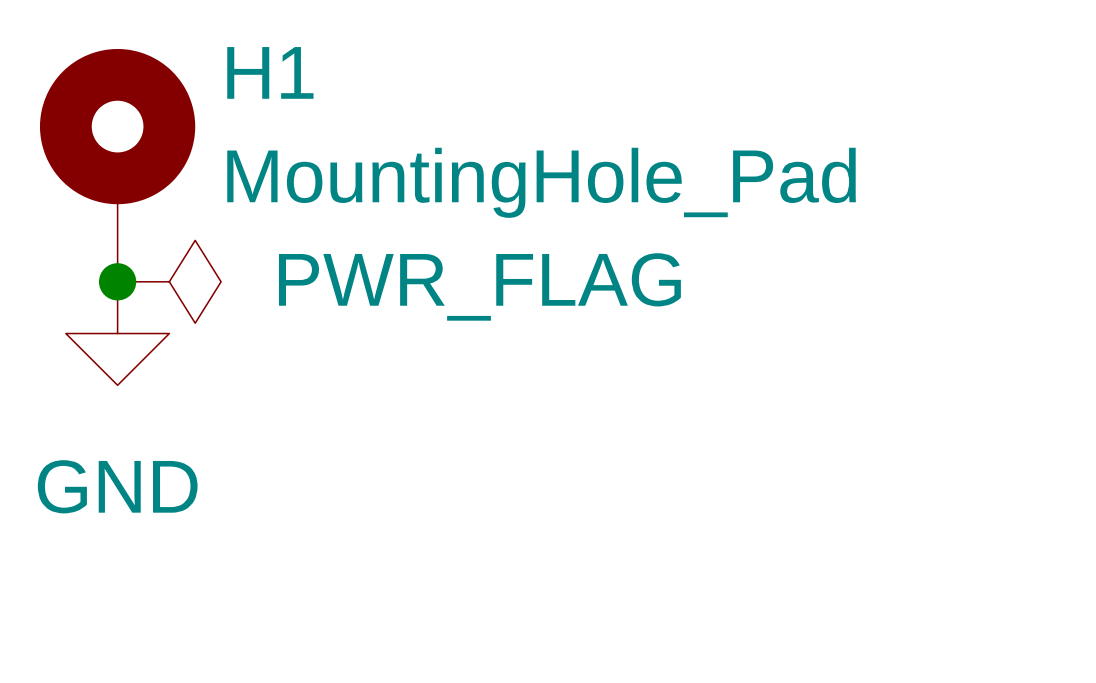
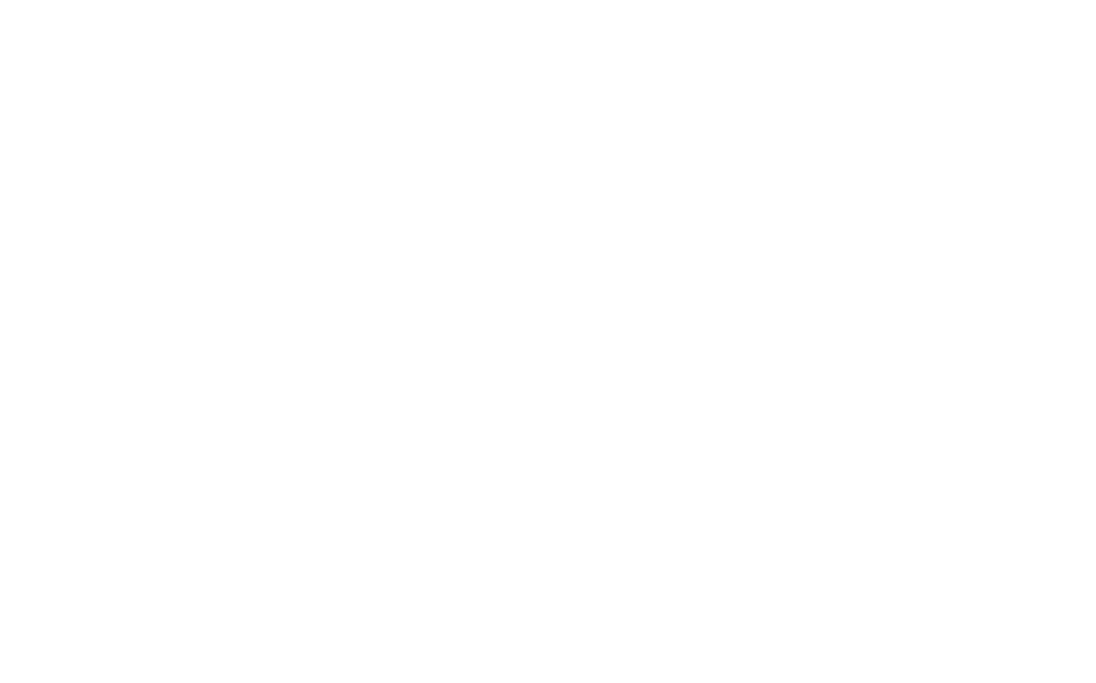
H1: MountingHole_Pad (117, 165) -> none
junction: (117, 281) -> none
power symbol: PWR_FLAG (169, 281) -> none
power symbol: GND (117, 333) -> none

